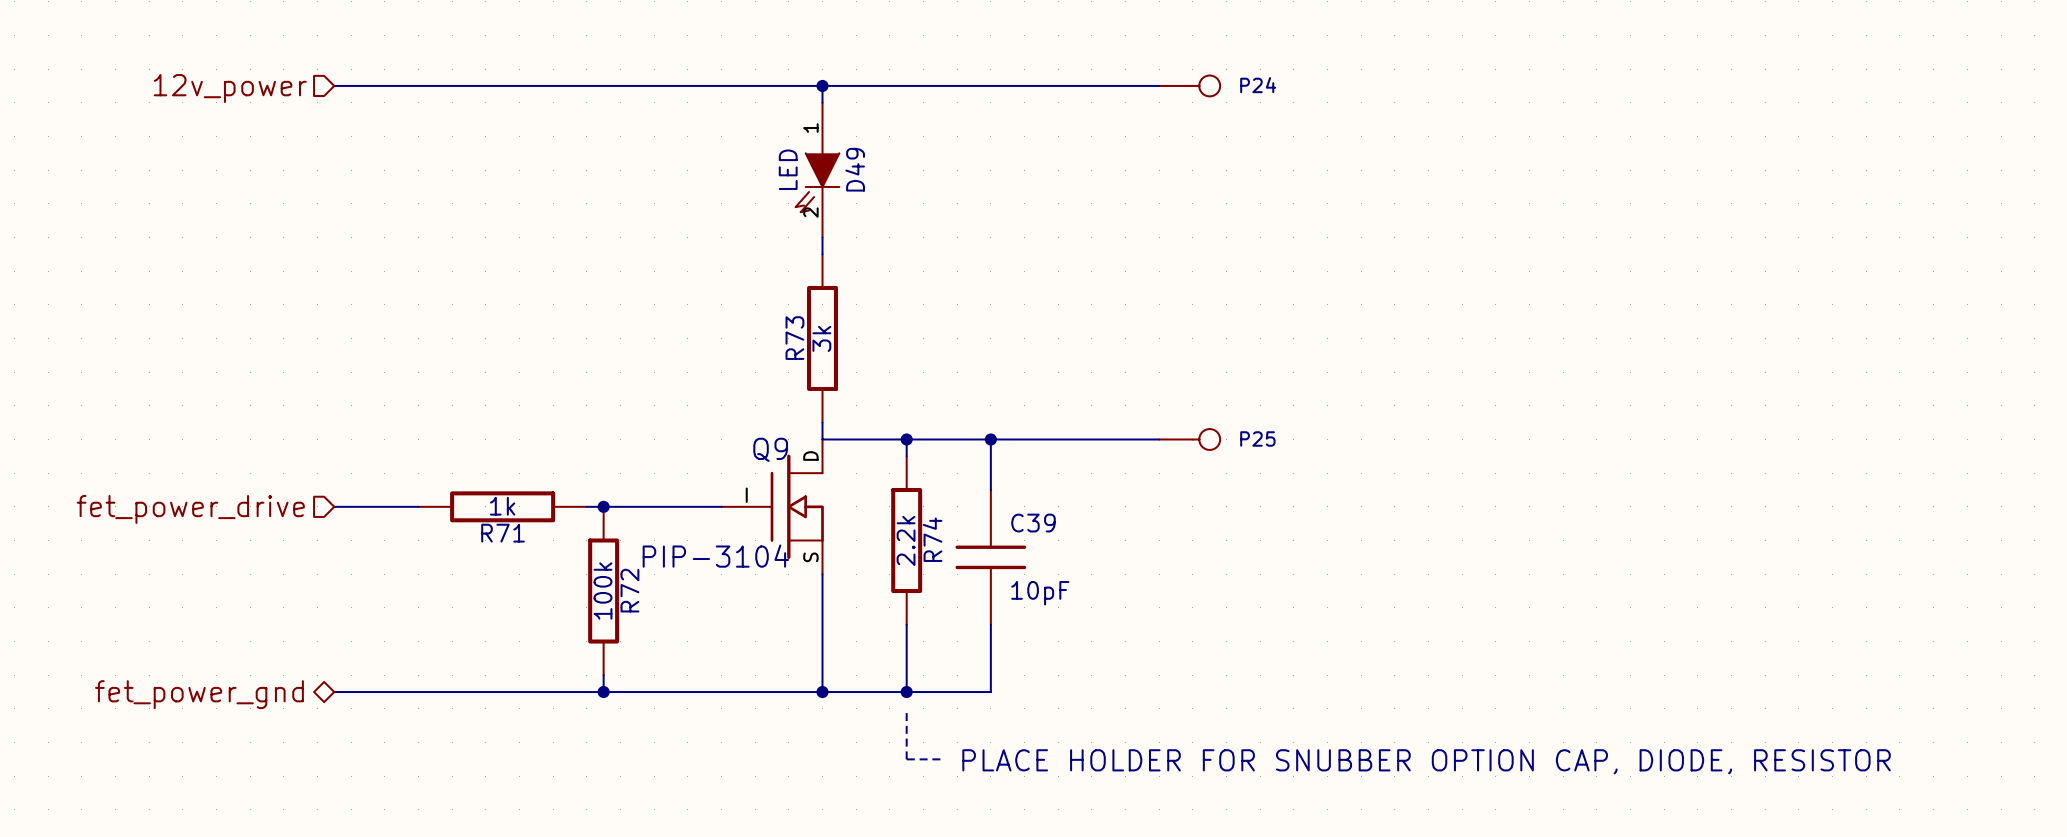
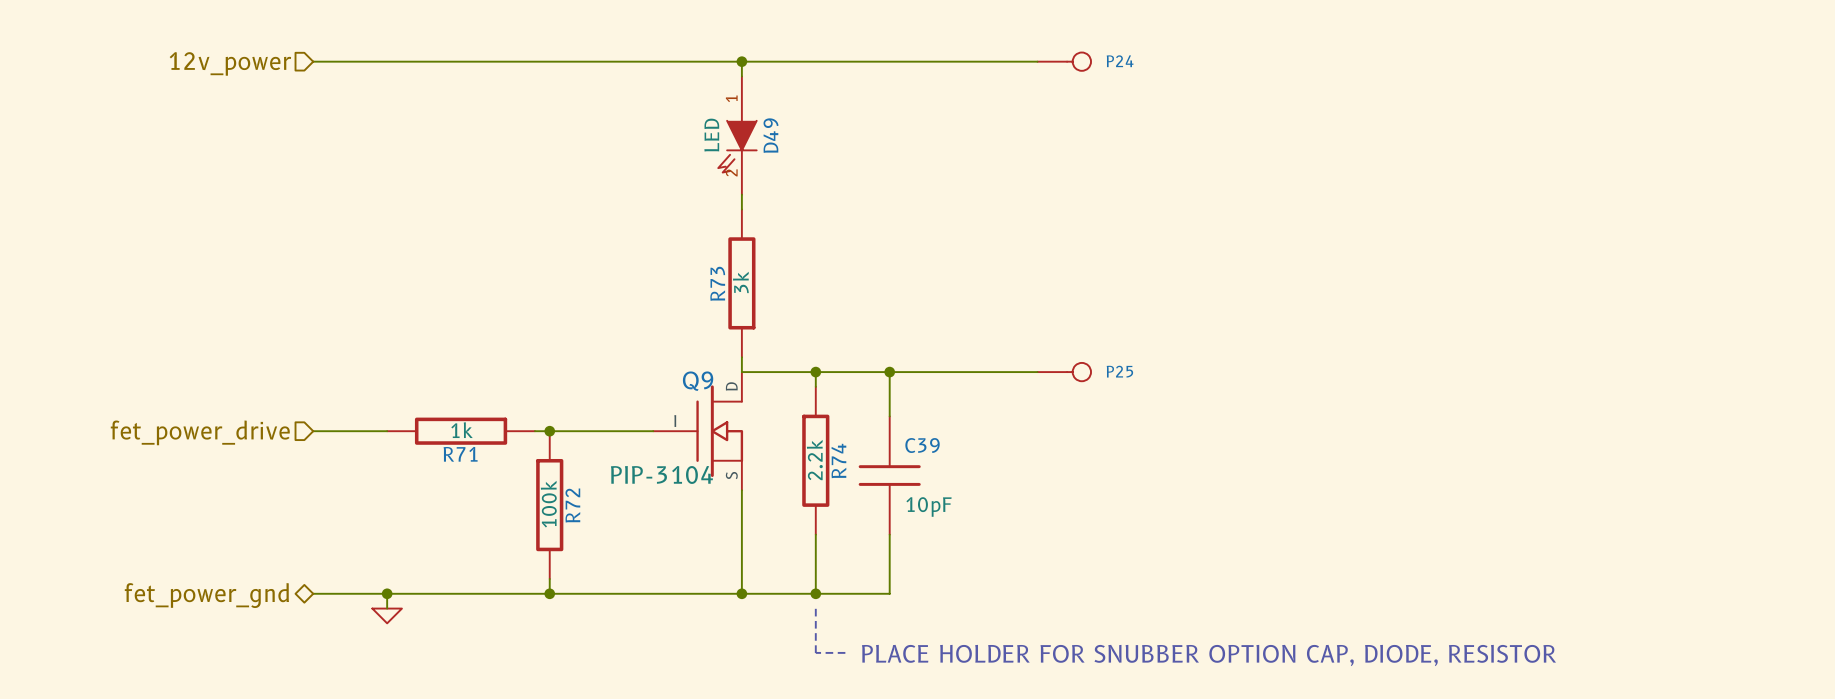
wire: none -> (387, 593) (387, 608)
junction: none -> (387, 593)
power symbol: none -> (387, 615)

